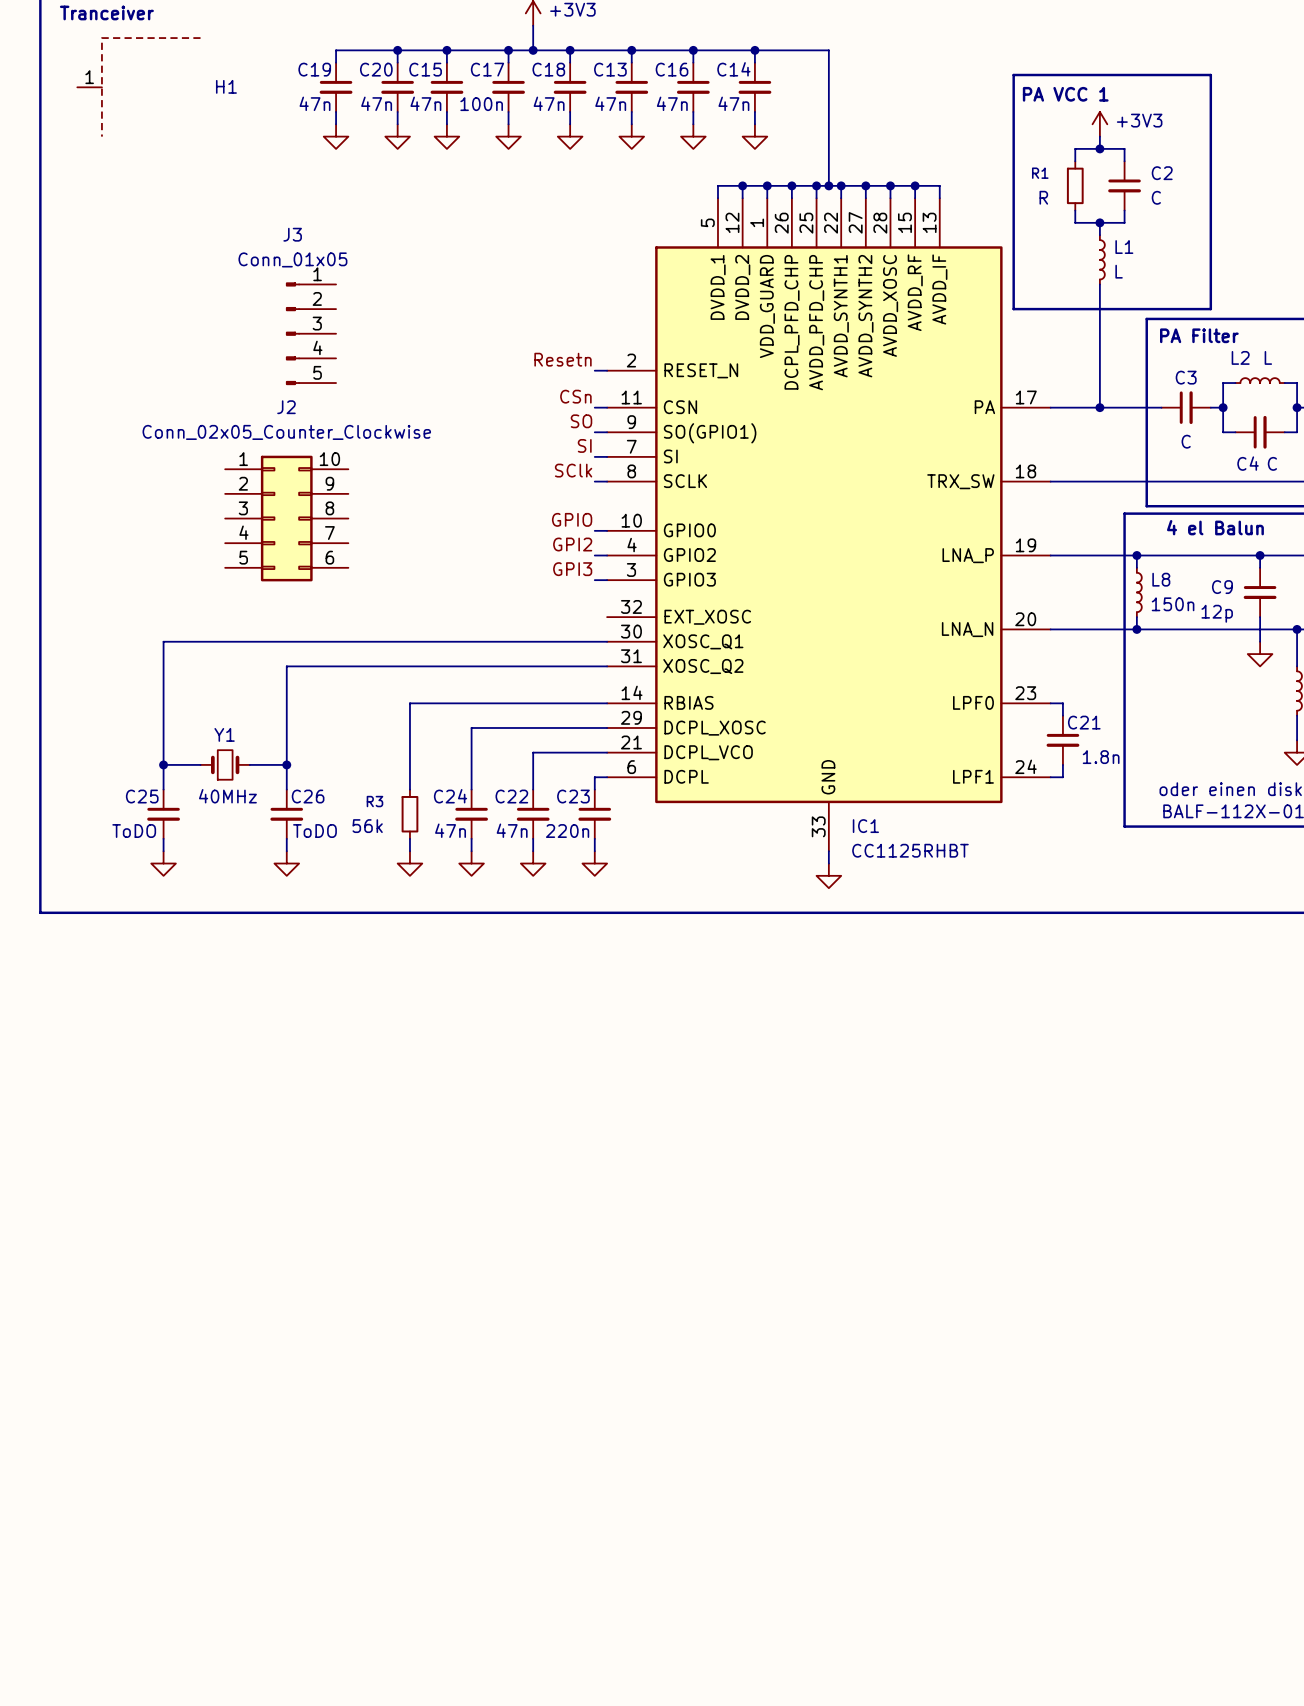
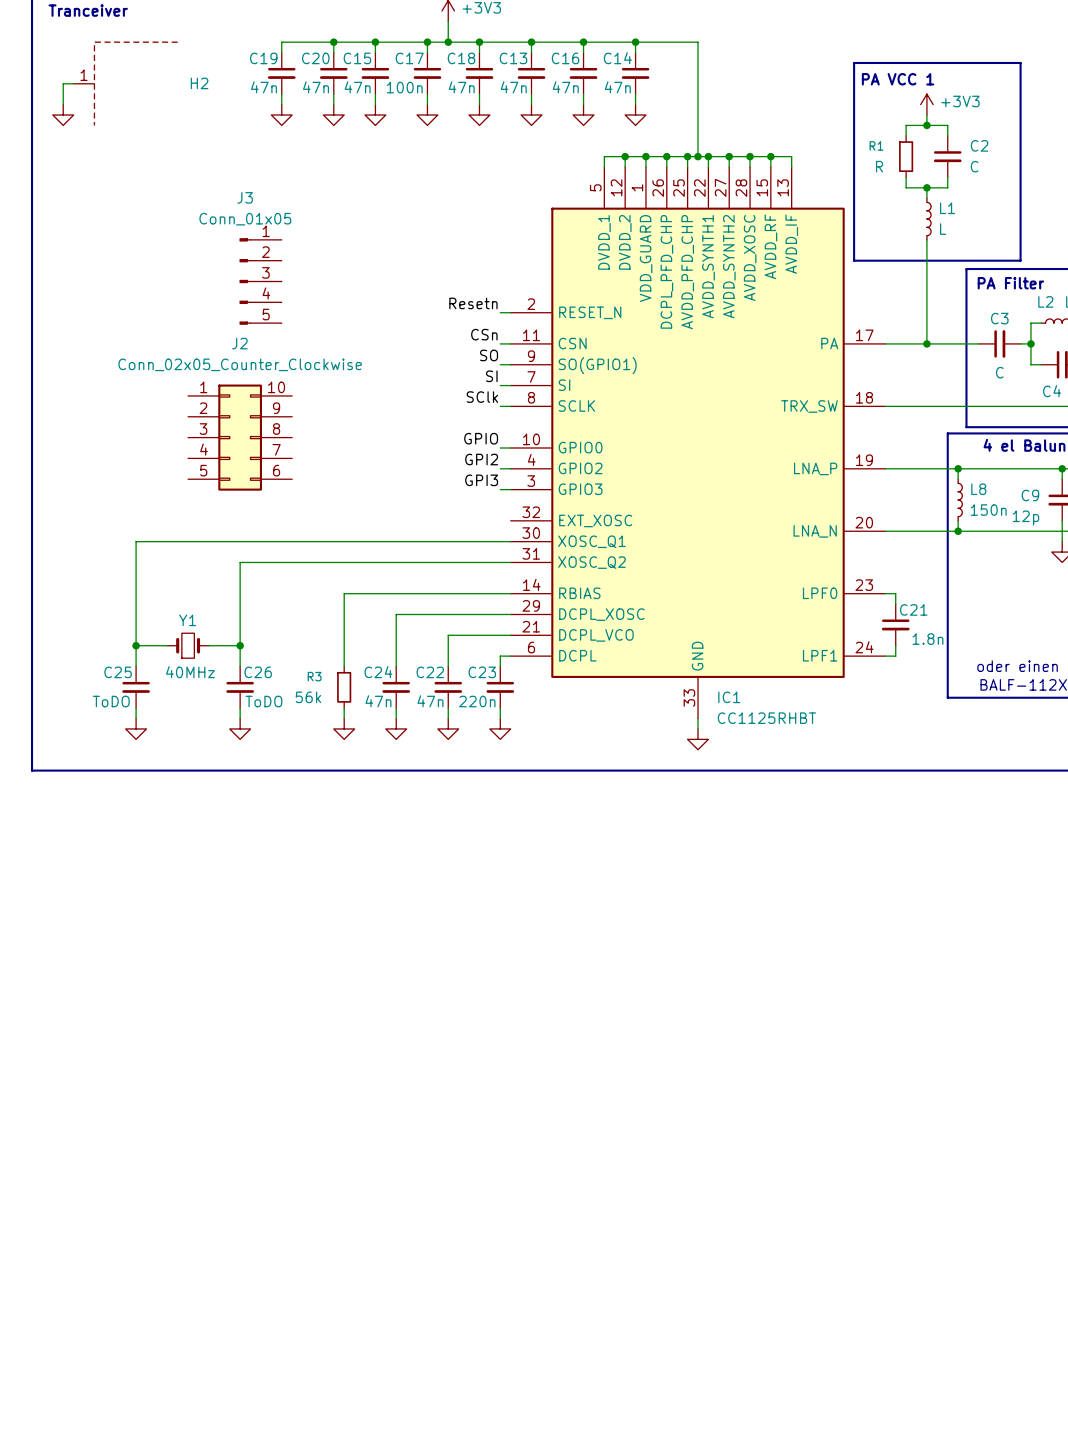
H1: (138, 87) -> none
wire: none -> (73, 83) (63, 83) (63, 104)
H2: none -> (125, 83)
power symbol: none -> (63, 115)

